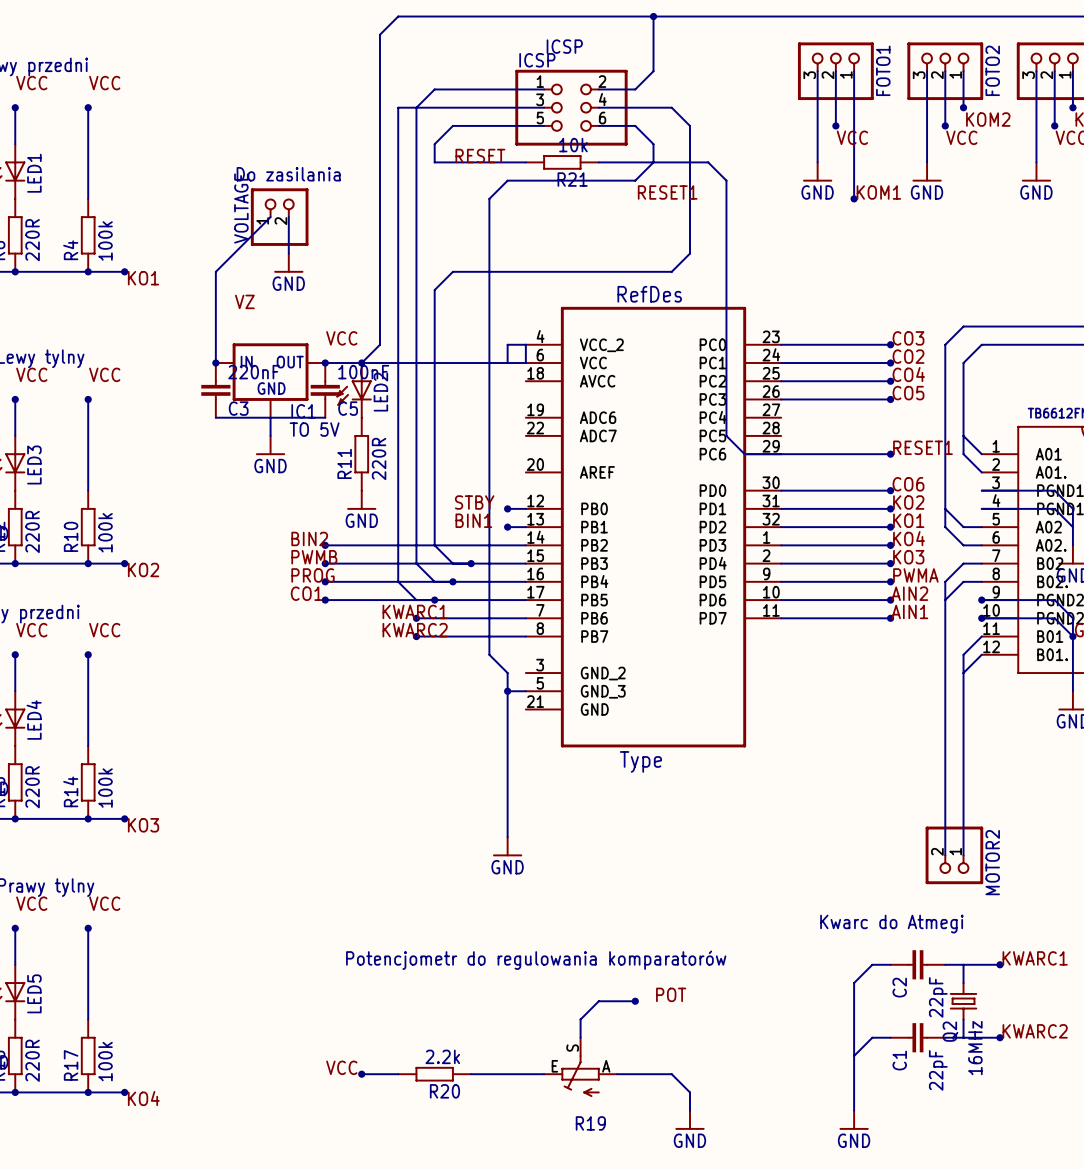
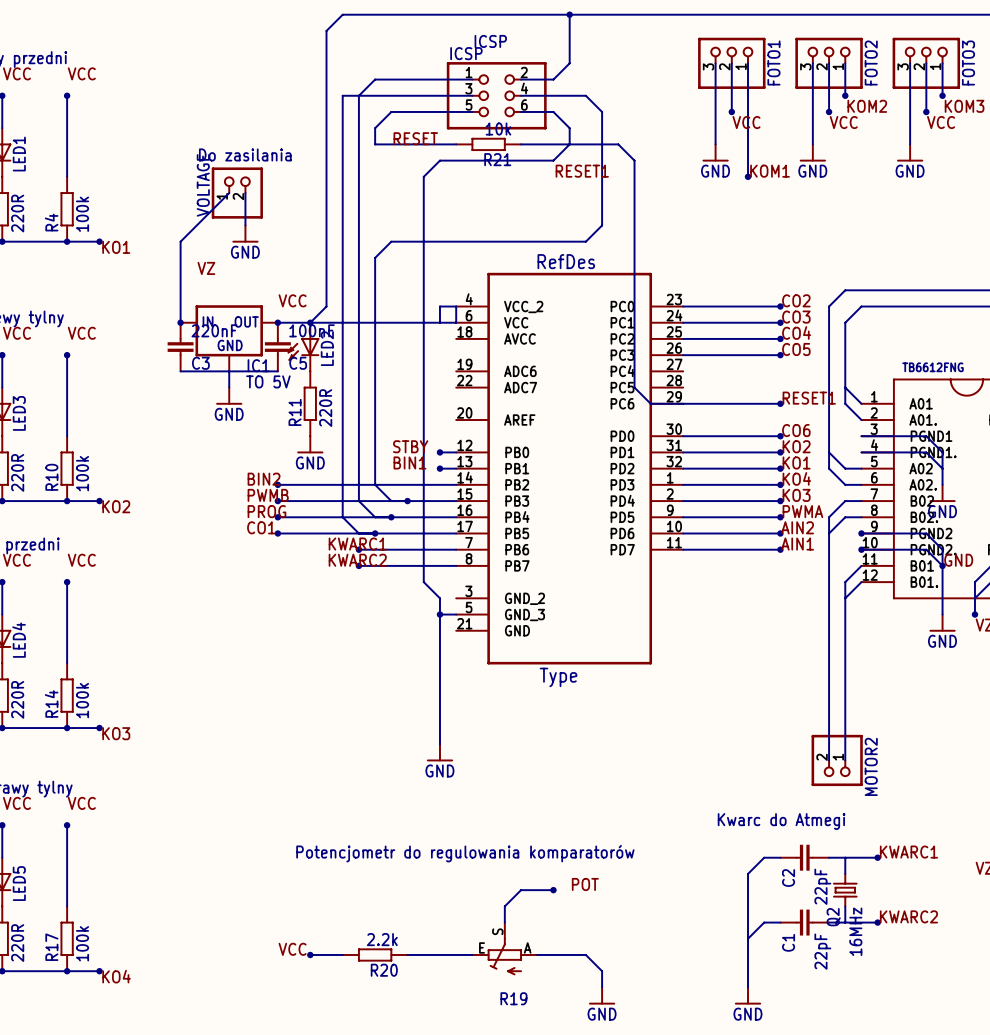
label: CO3 (908, 338) -> CO2 (796, 300)
label: CO2 (908, 356) -> CO3 (796, 317)

